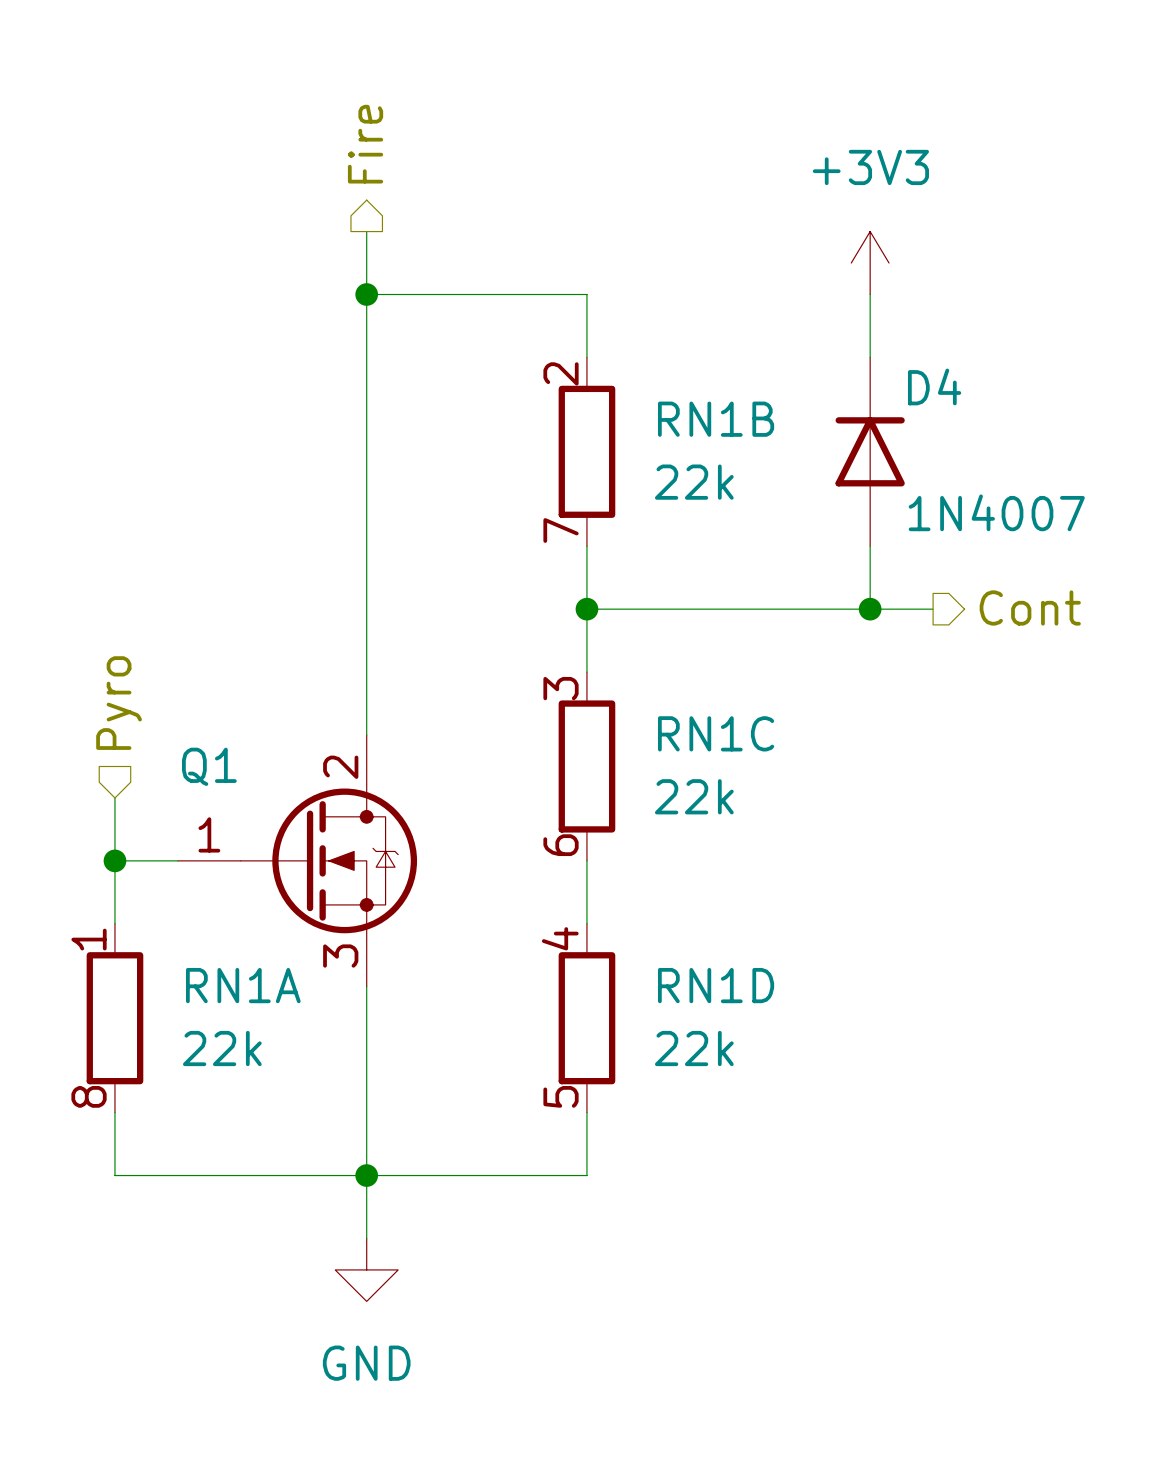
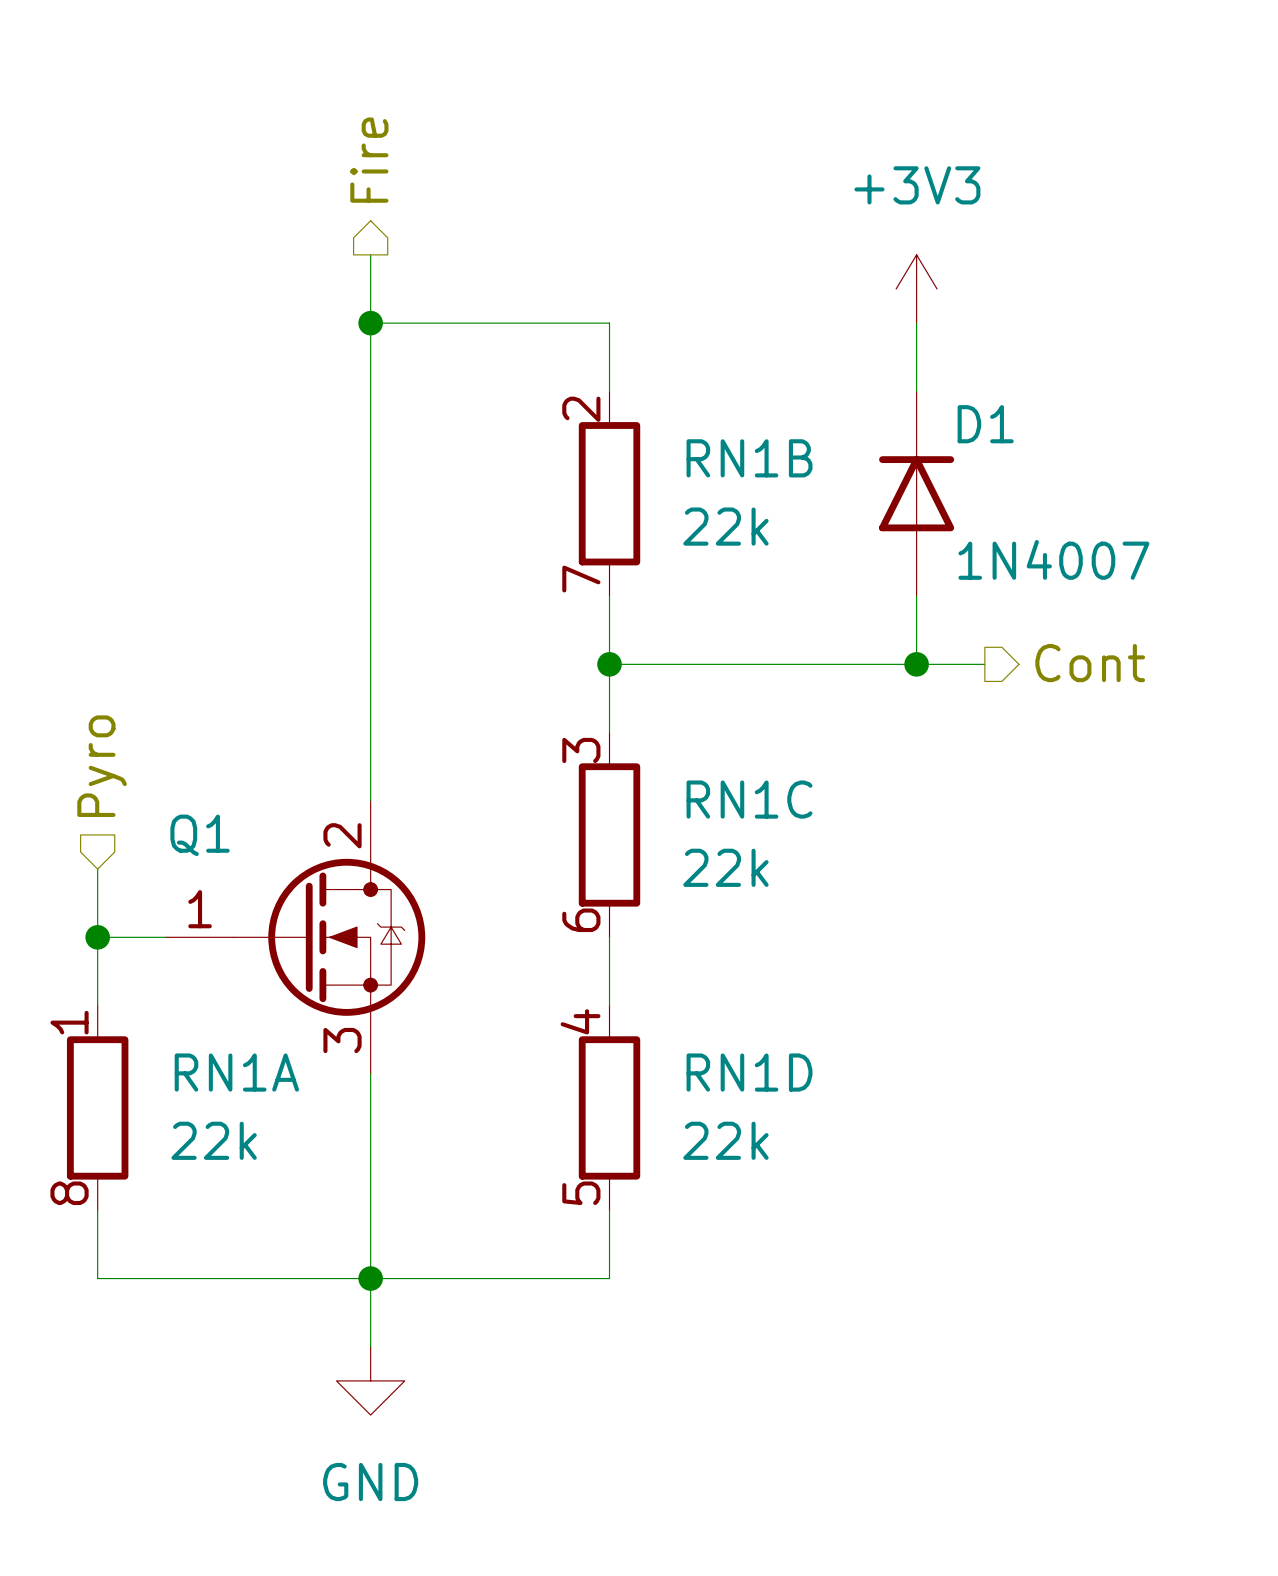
D4 name: D4 (934, 386) -> D1 (985, 424)

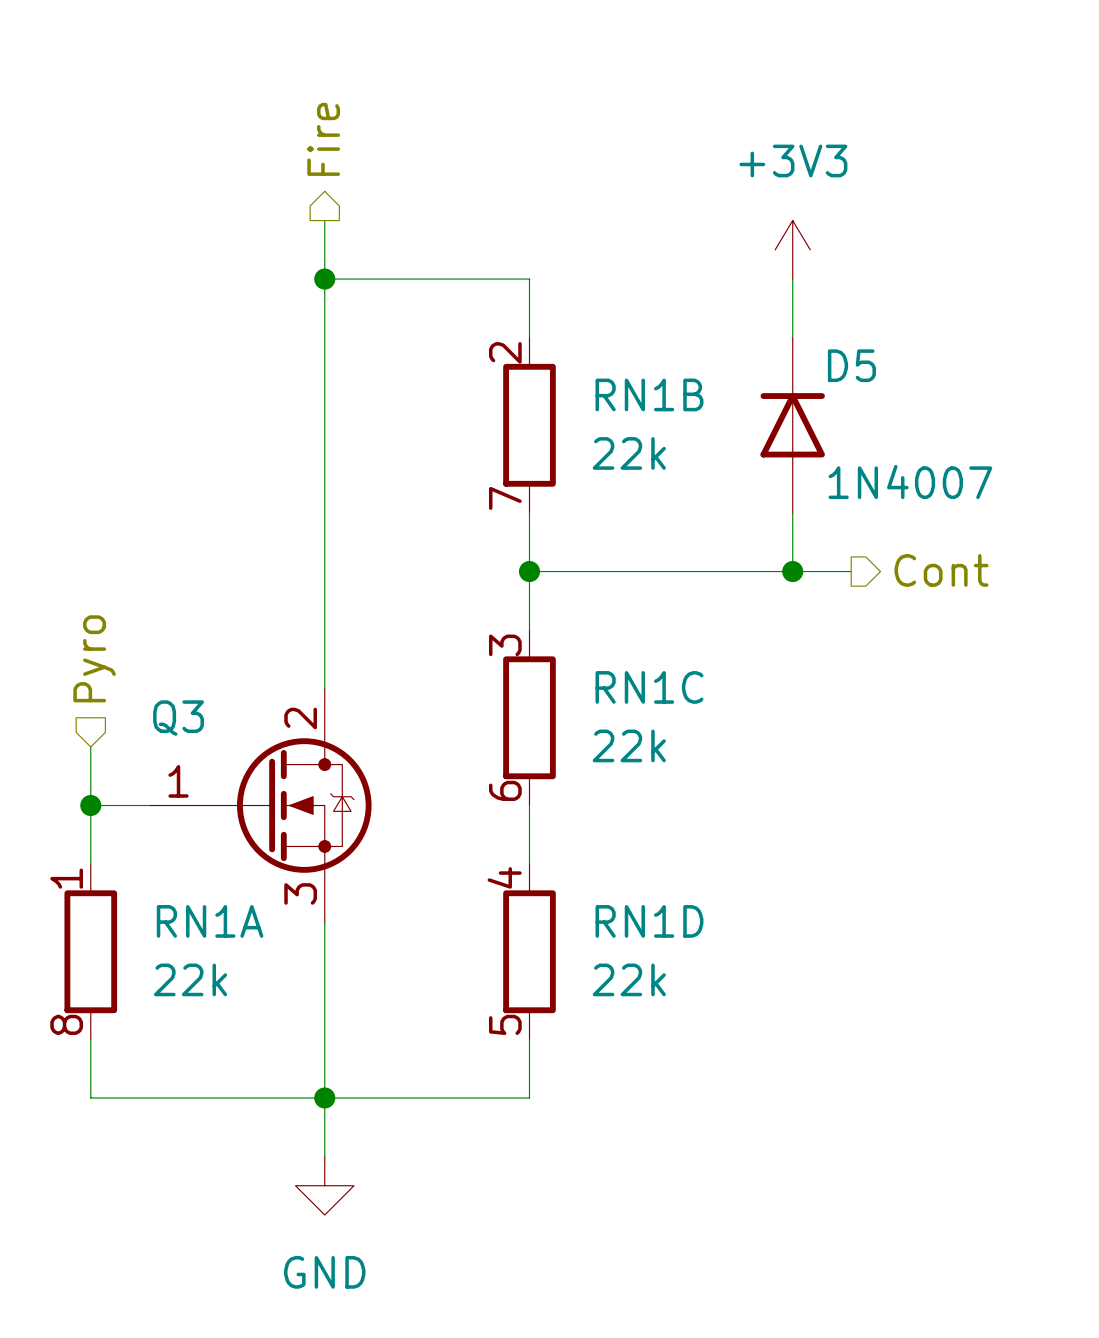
D1 name: D1 (985, 424) -> D5 (851, 365)
Q1 name: Q1 (200, 835) -> Q3 (178, 718)

